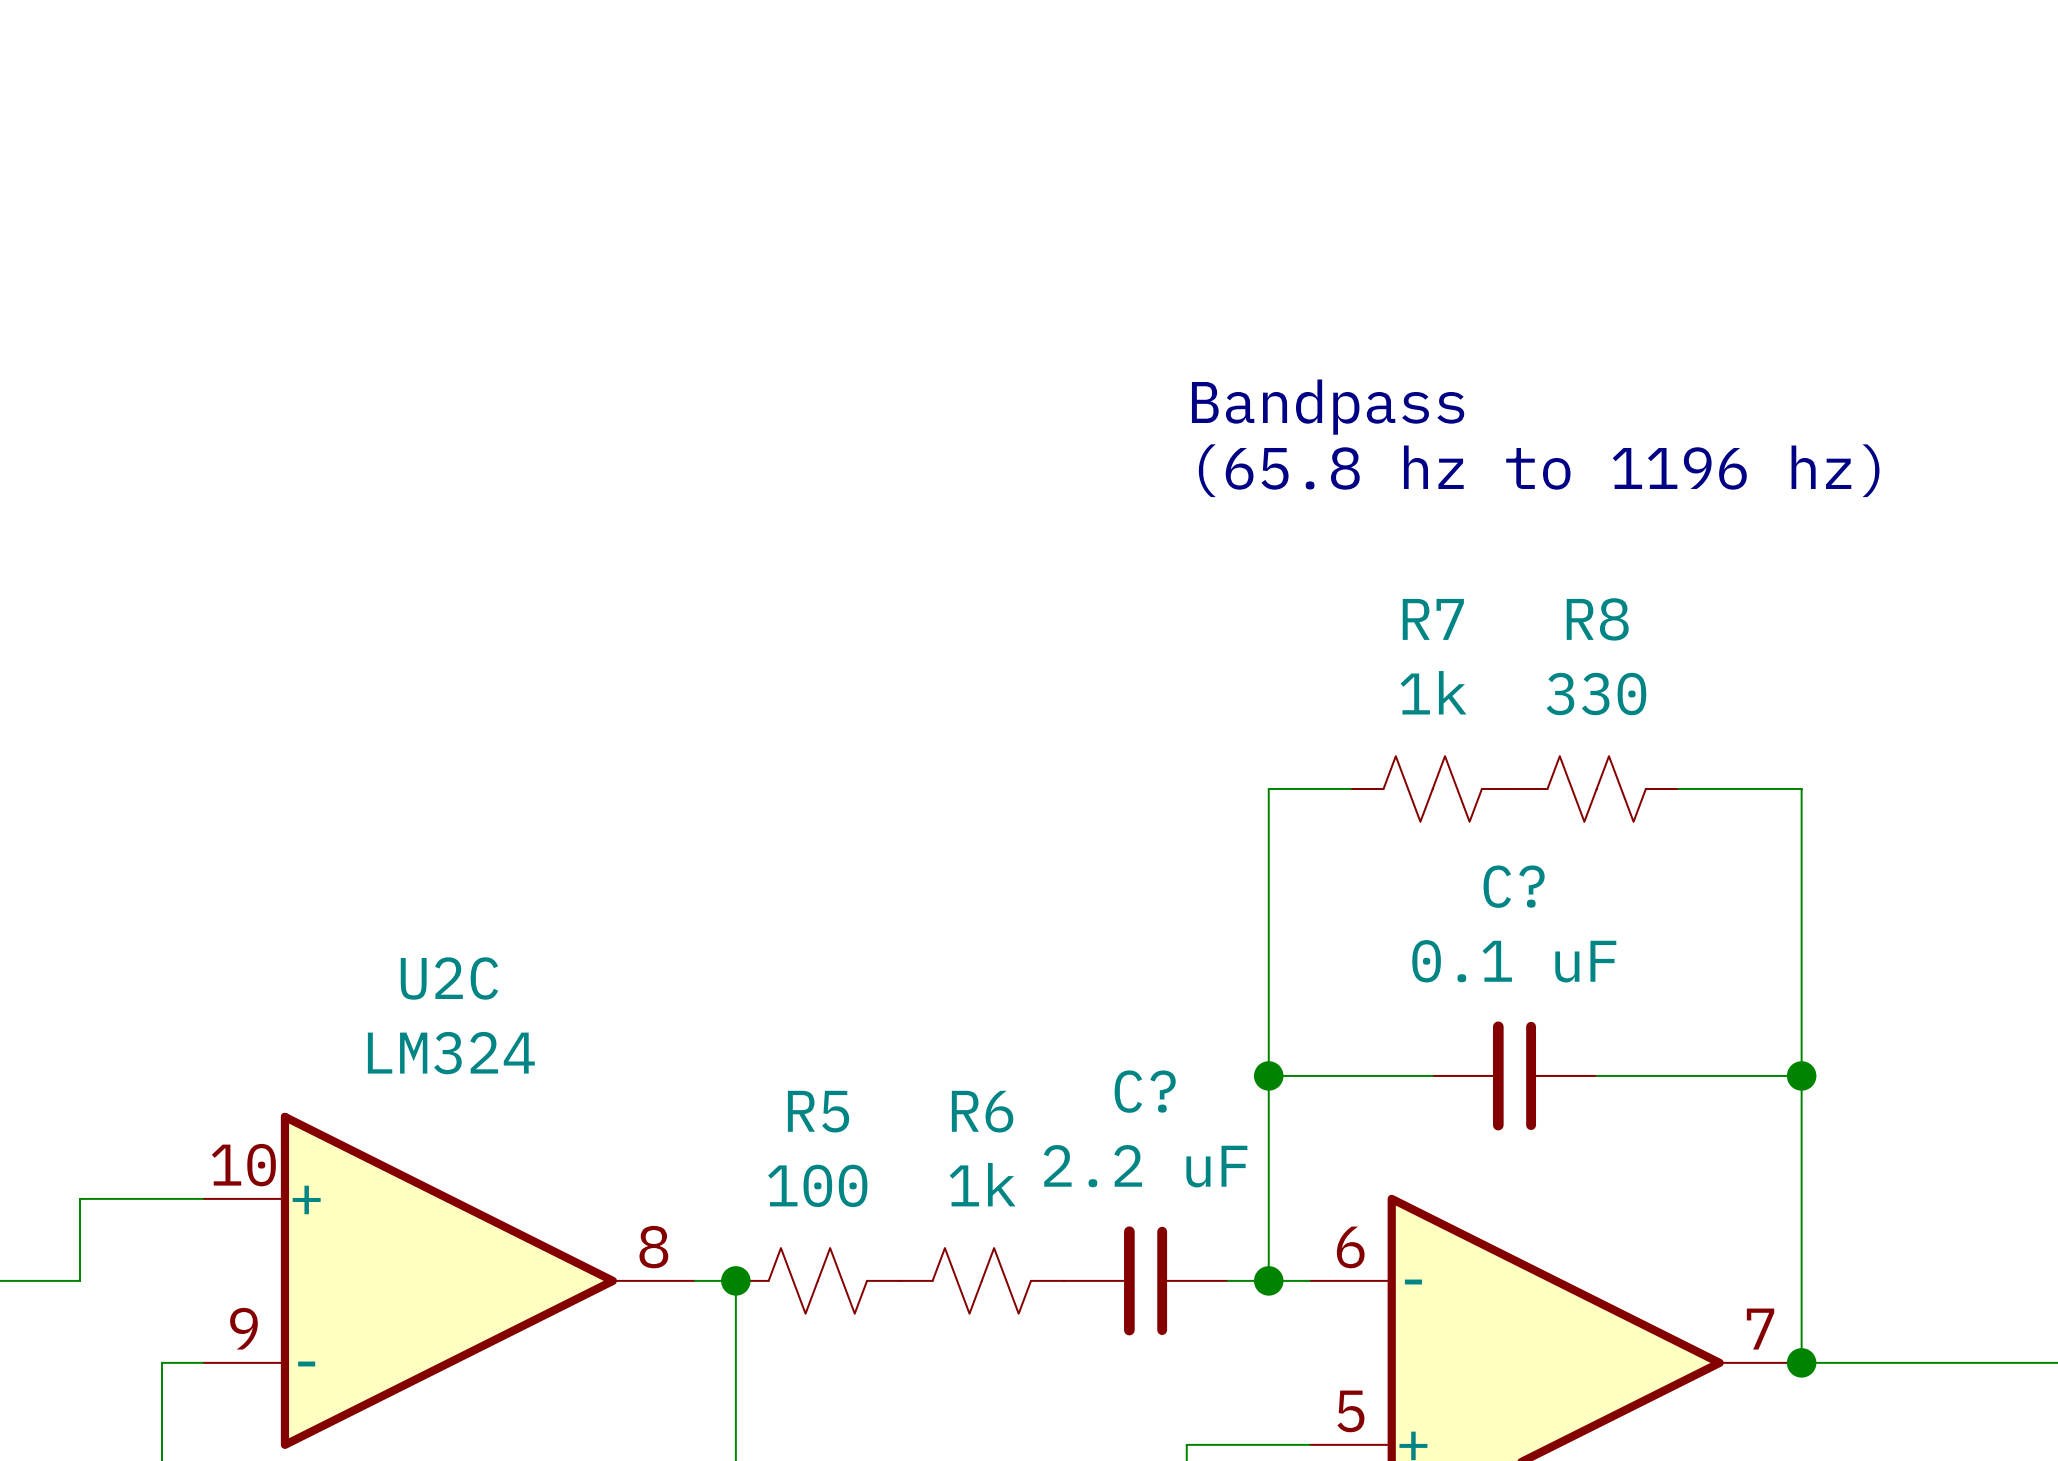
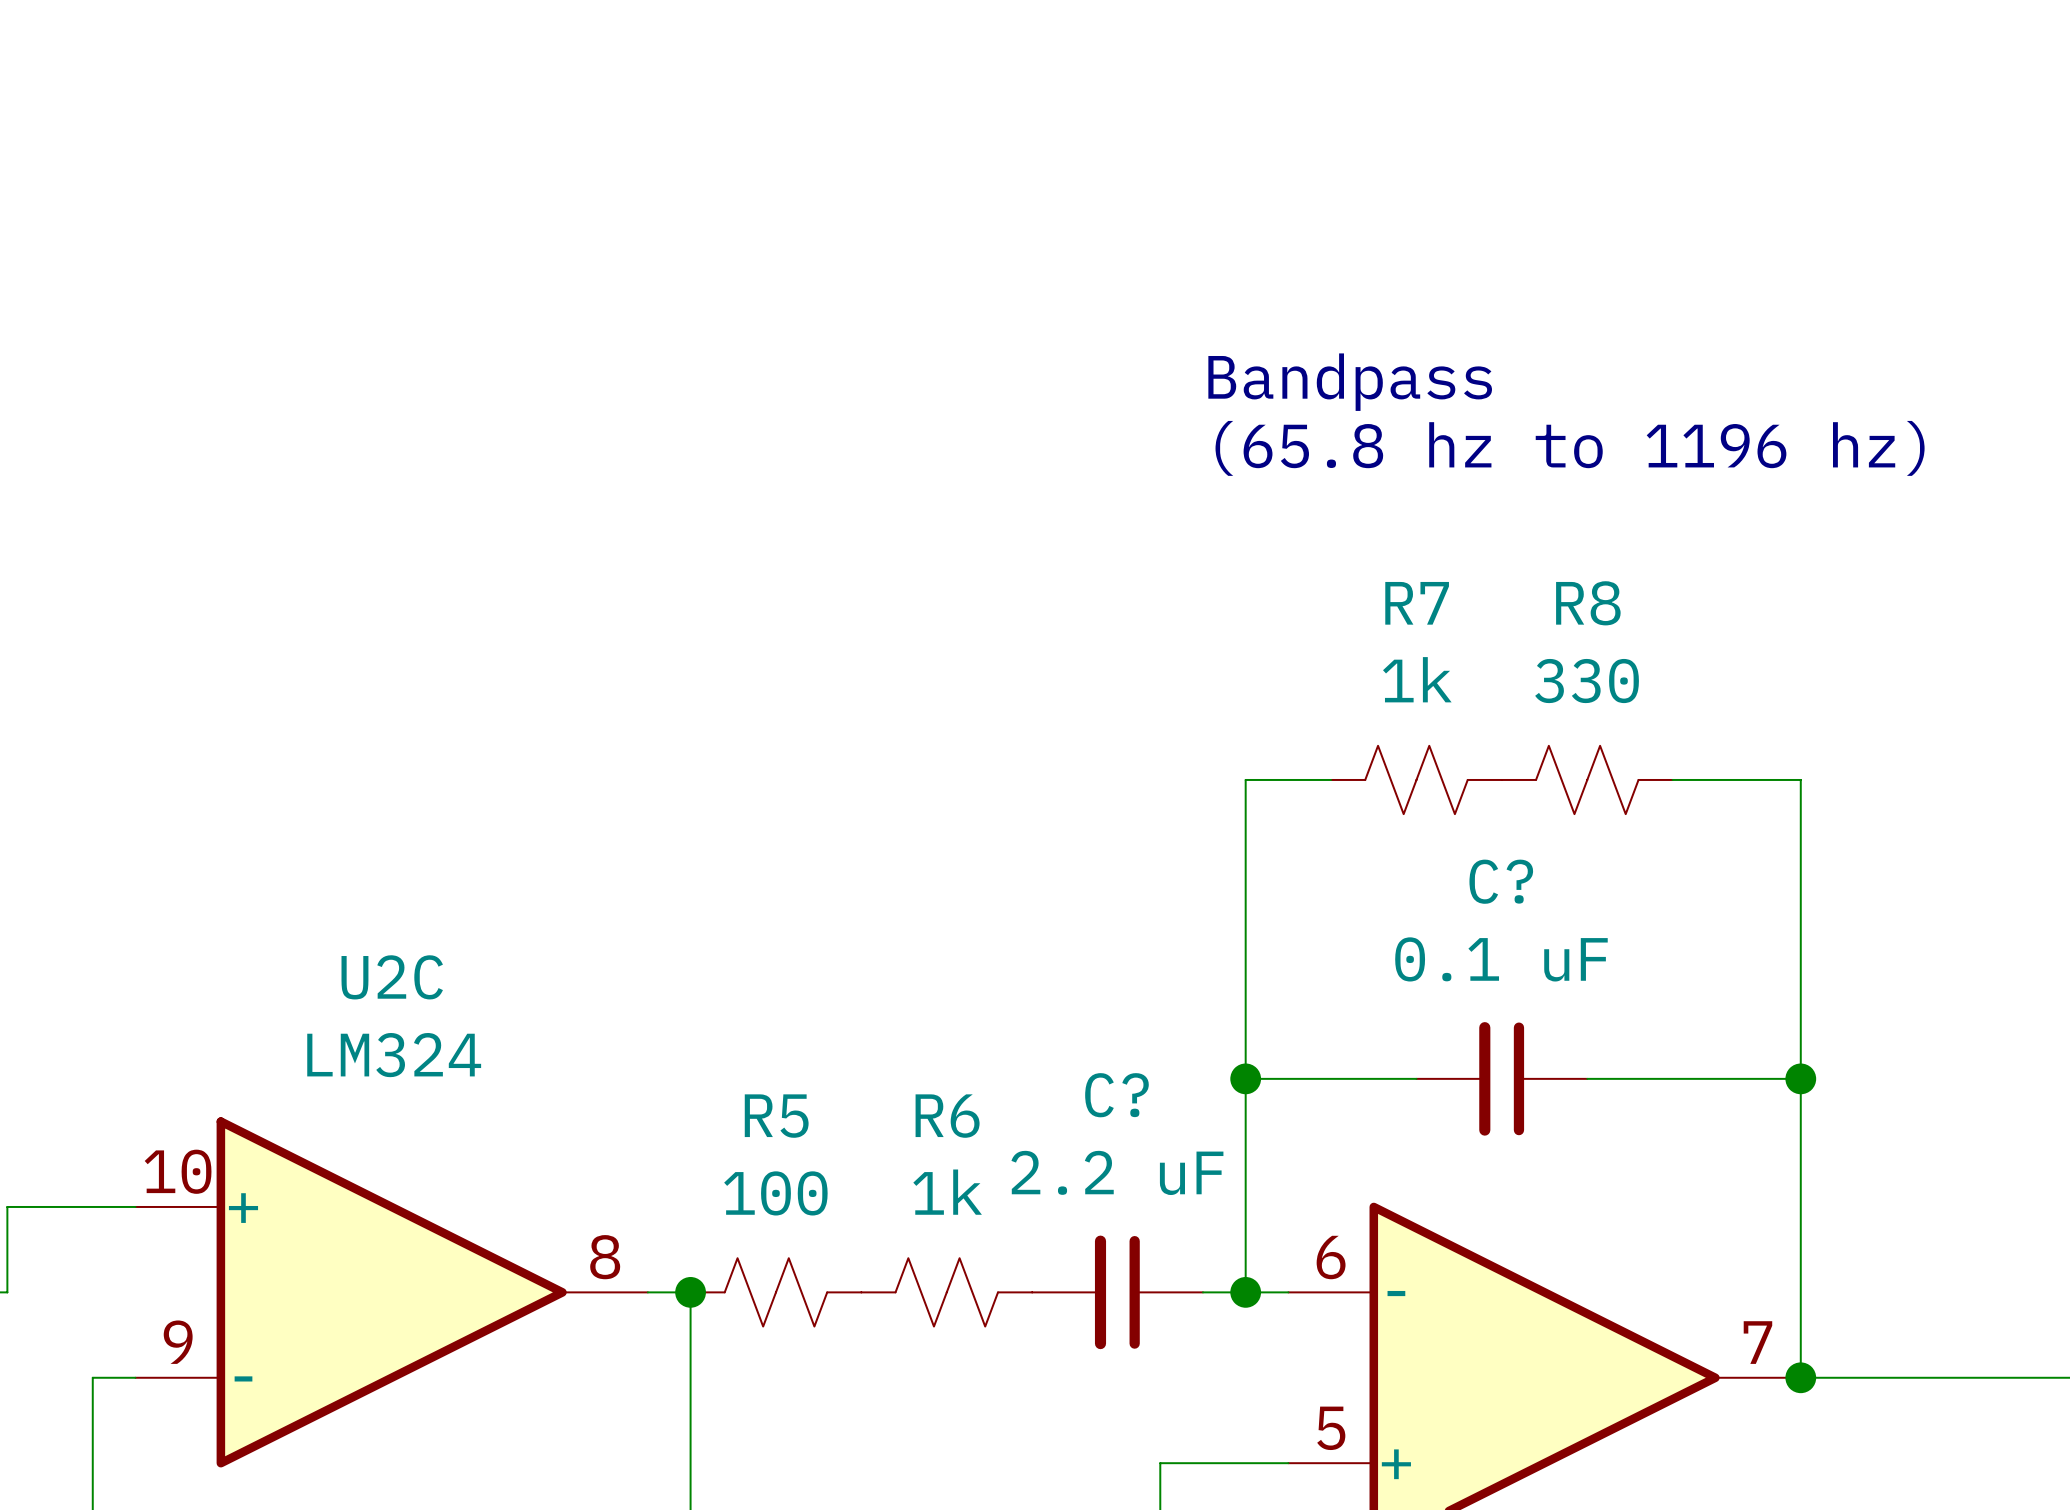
text position: Bandpass (1328, 407) -> Bandpass (1350, 382)
text position: (65.8 hz to 1196 hz) (1539, 470) -> (65.8 hz to 1196 hz) (1570, 448)

